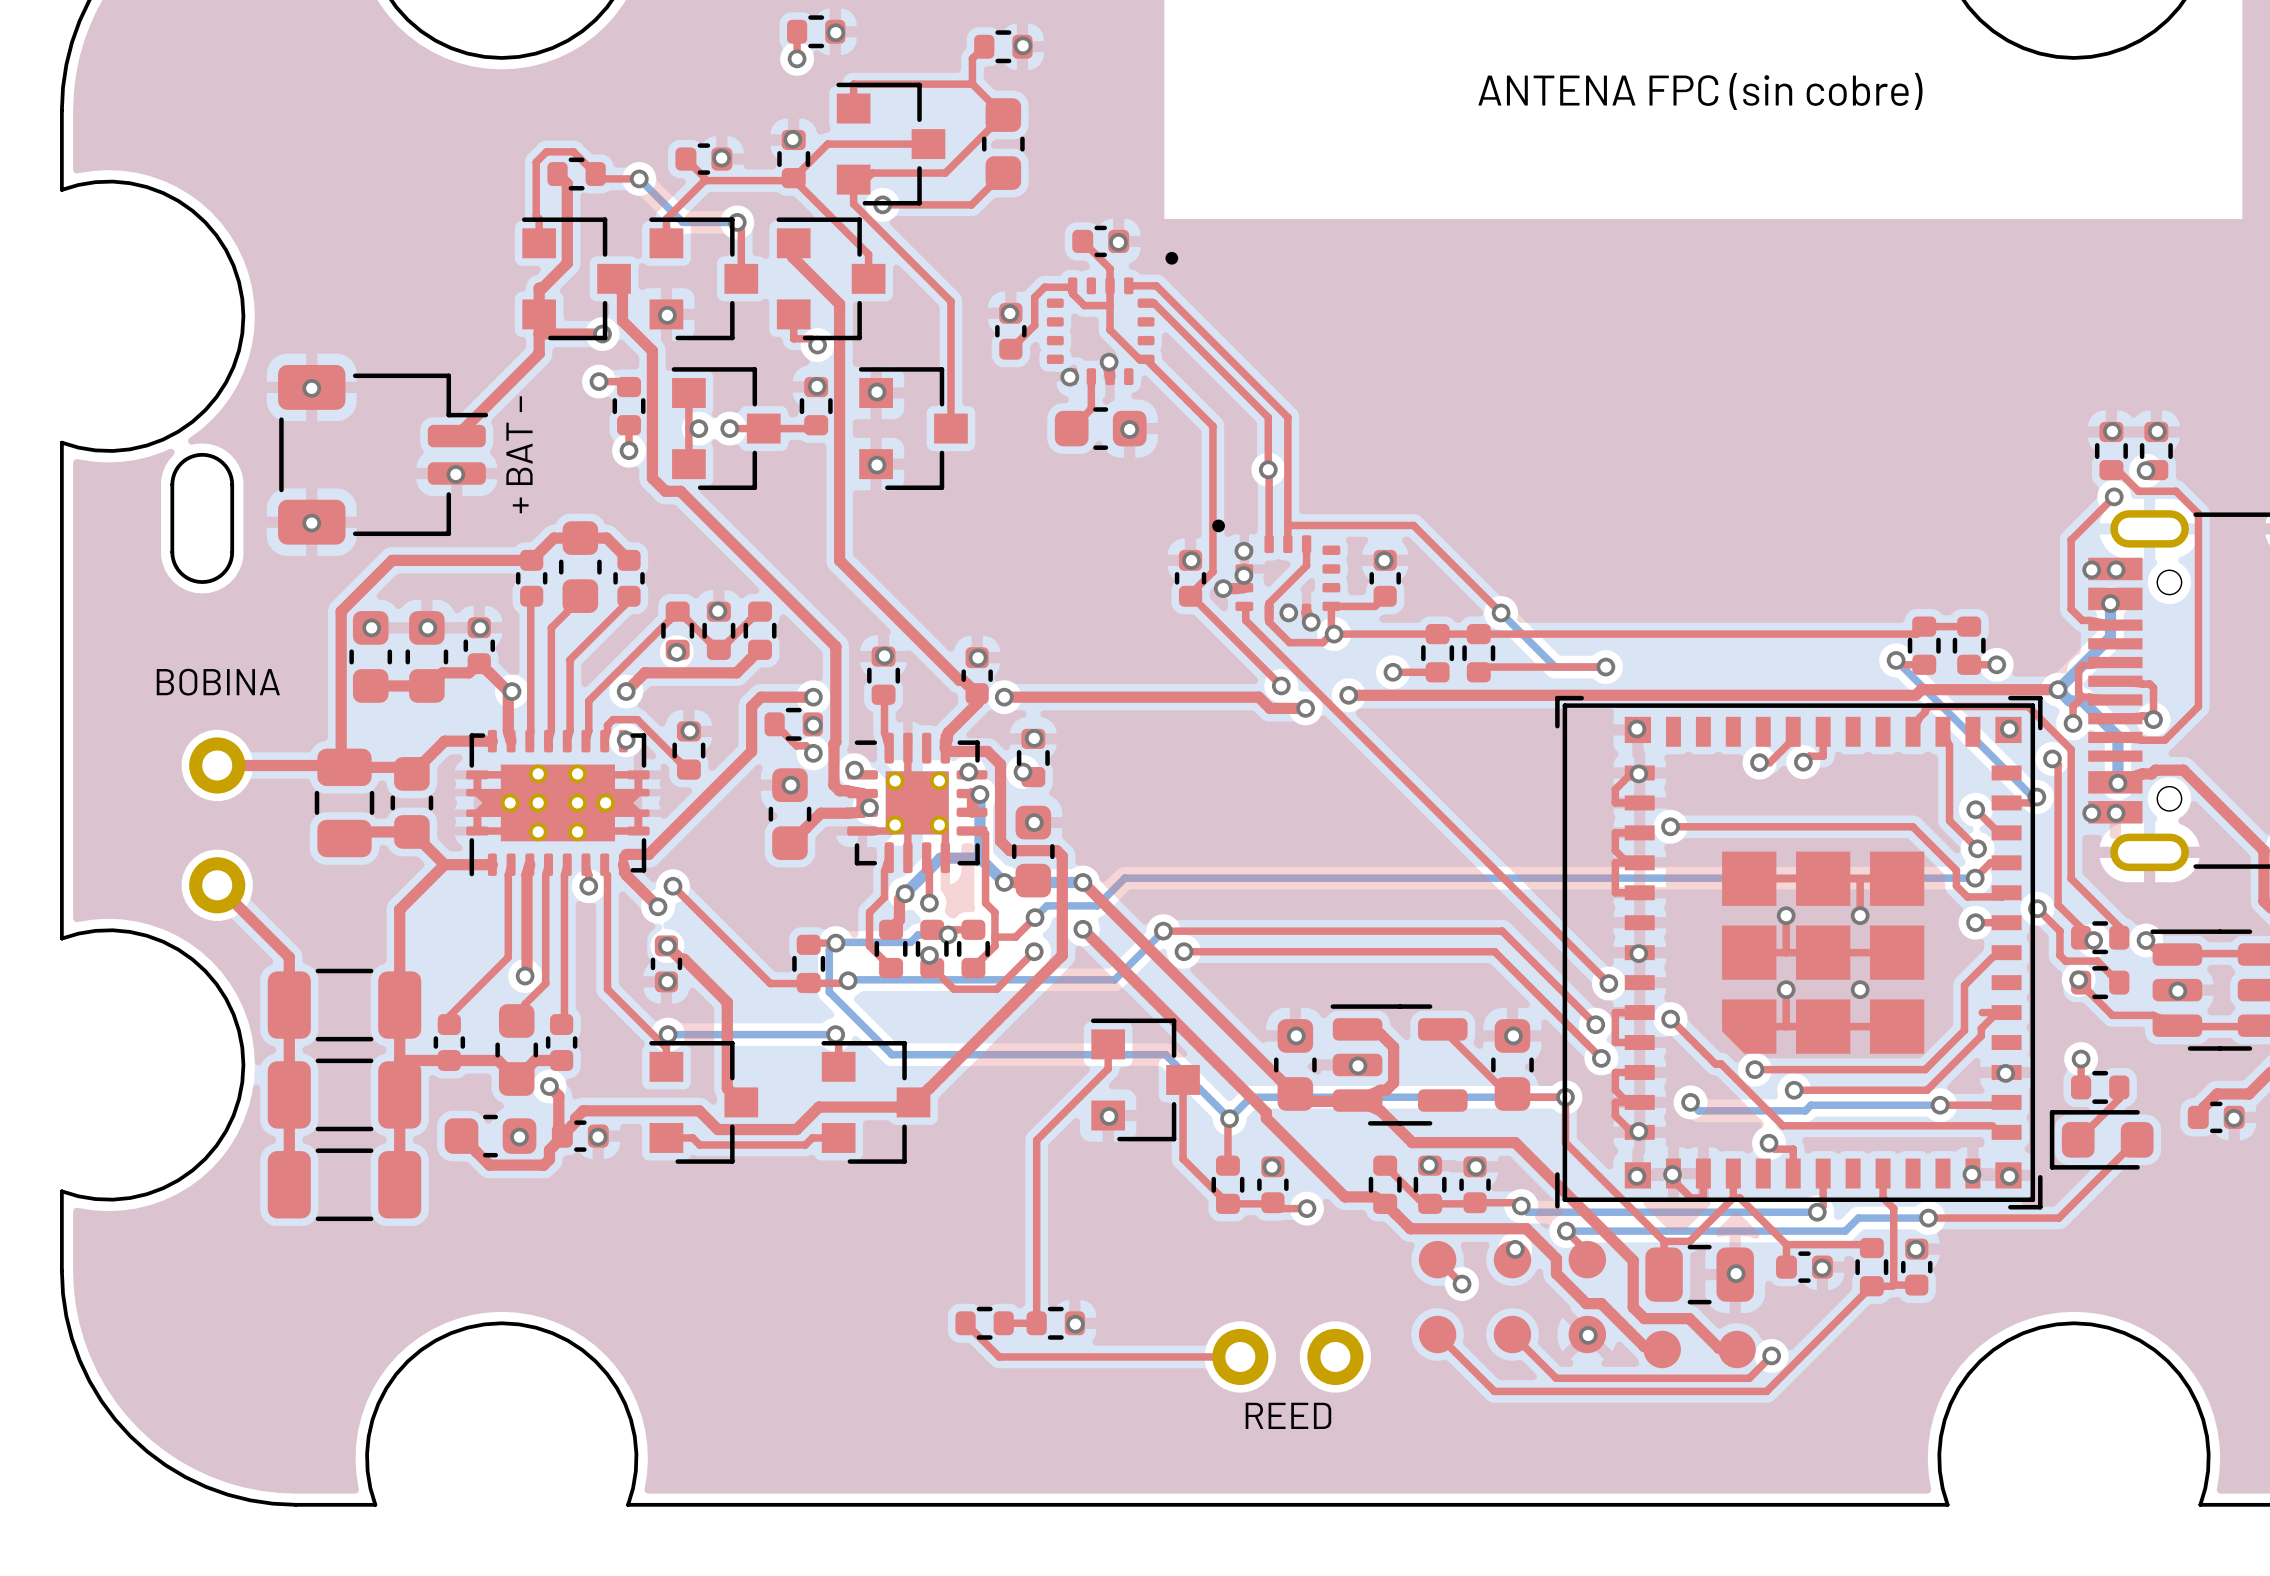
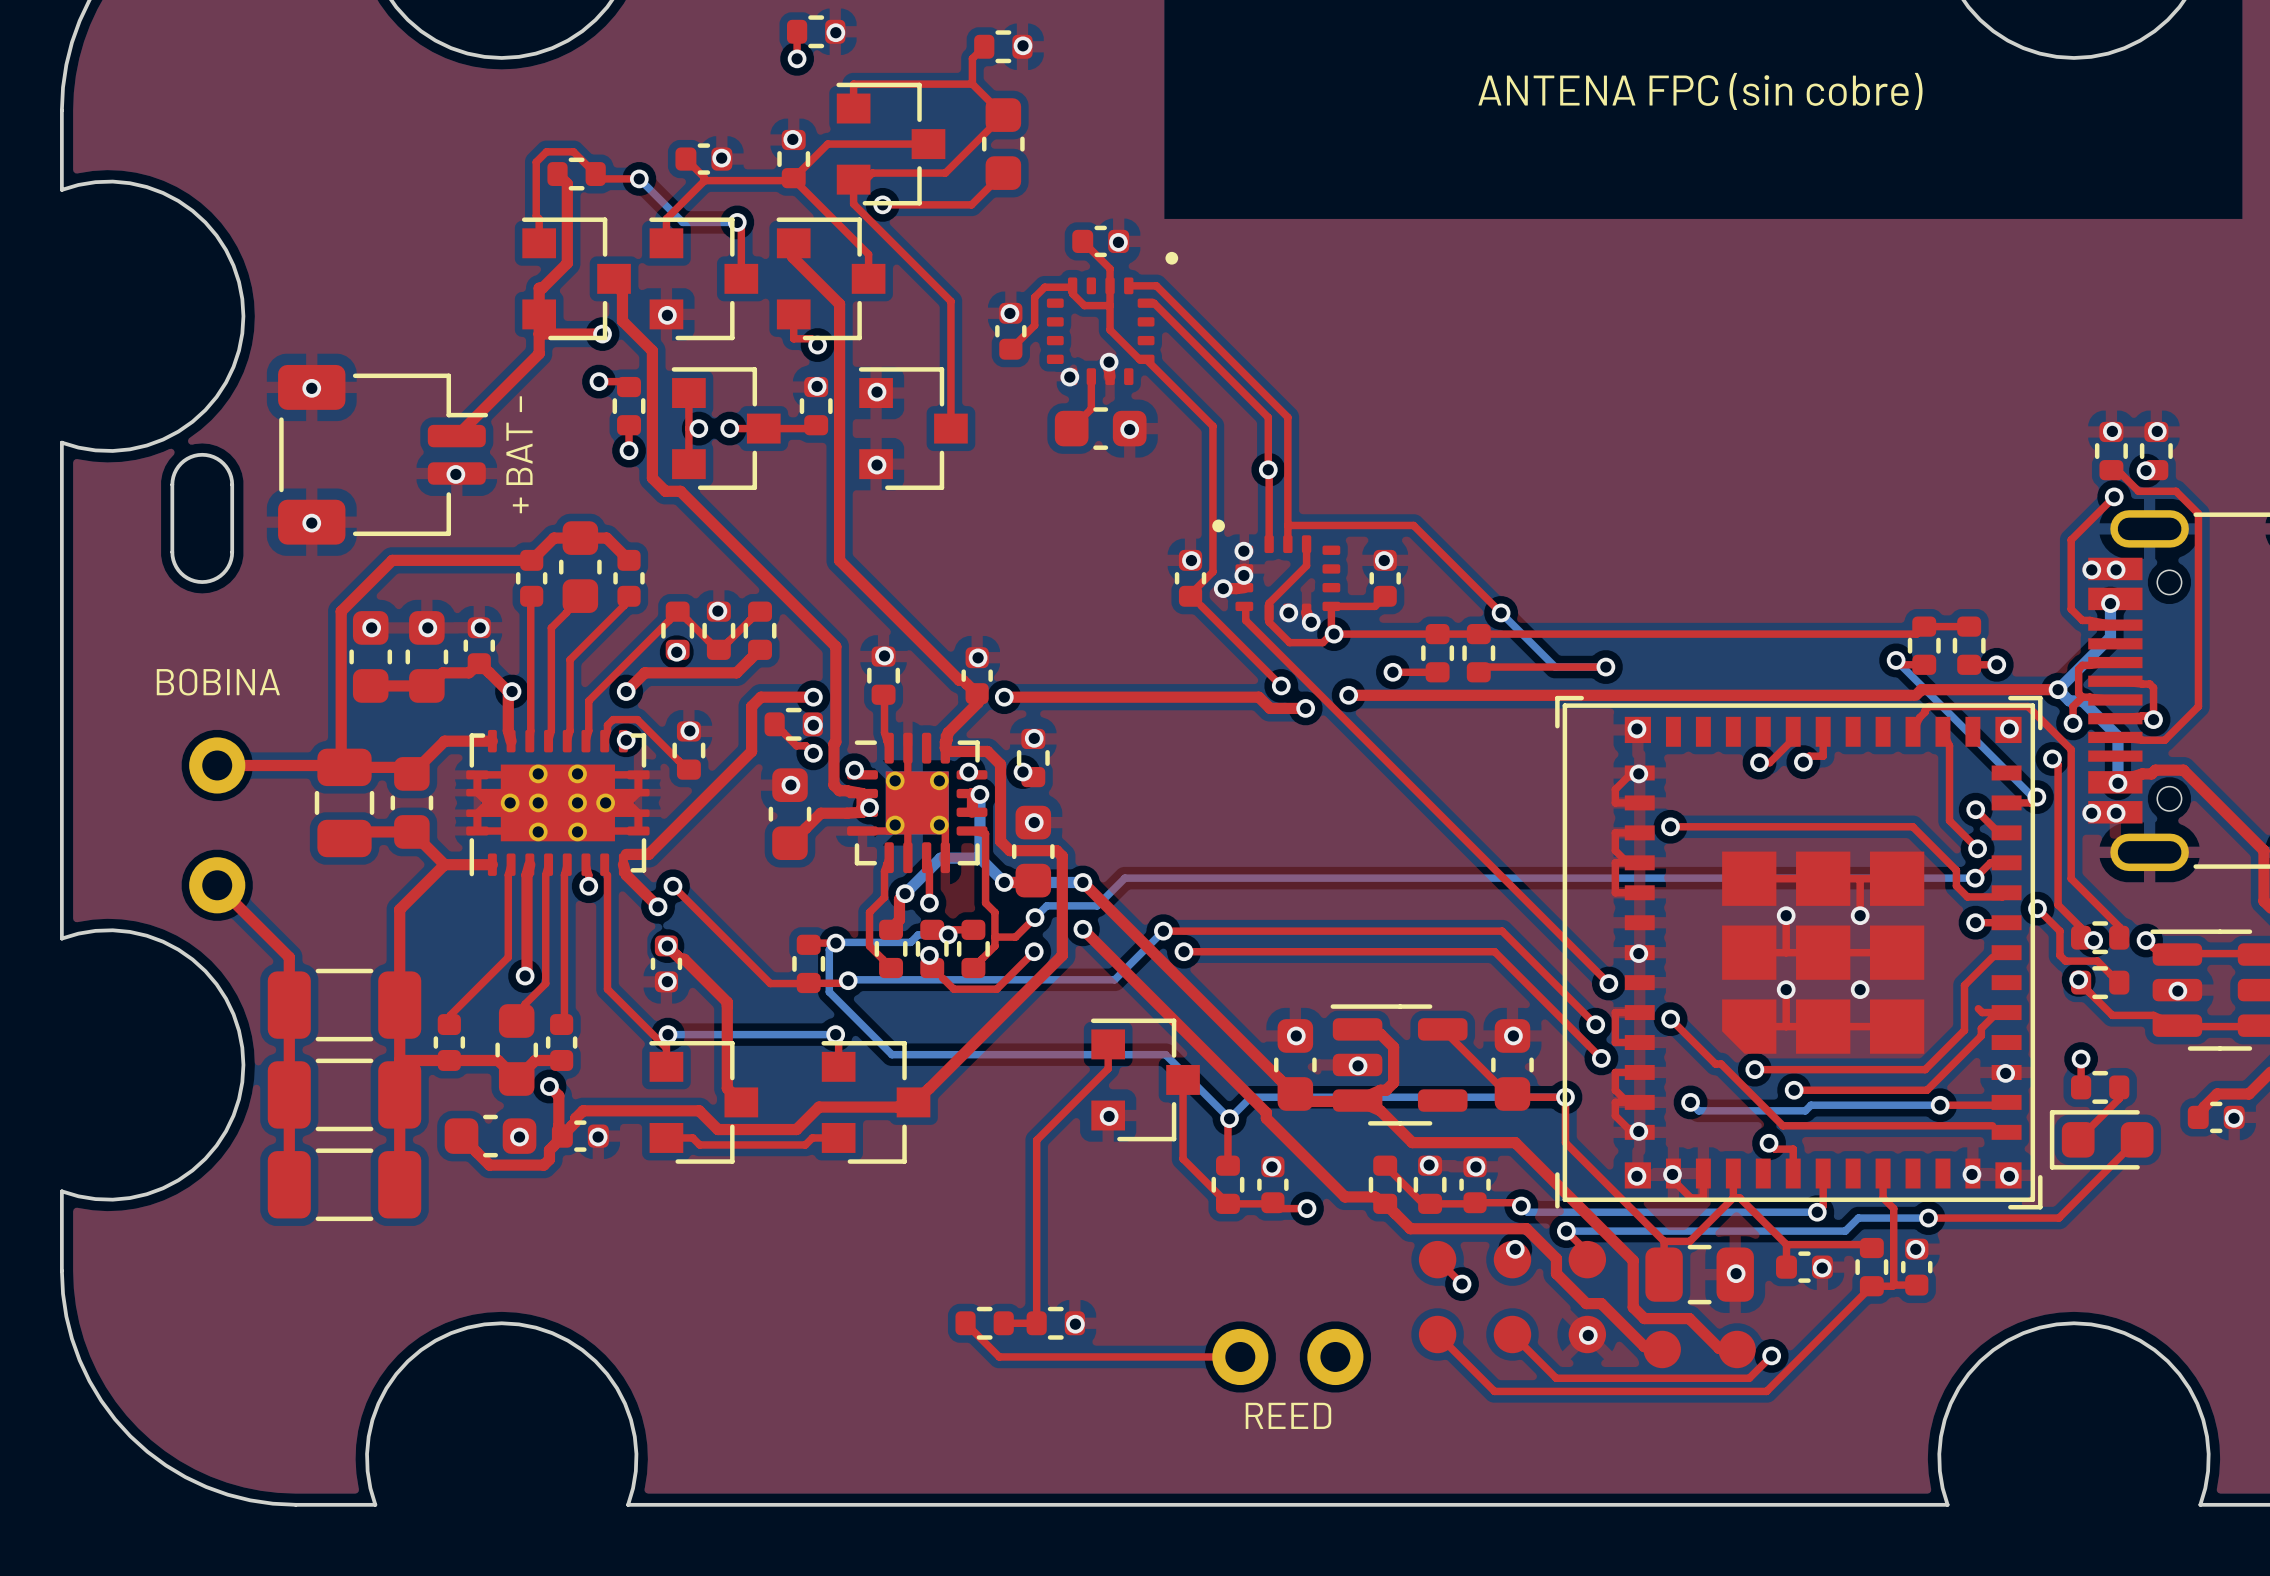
top track: none -> (1978, 1008) (1982, 1012)

